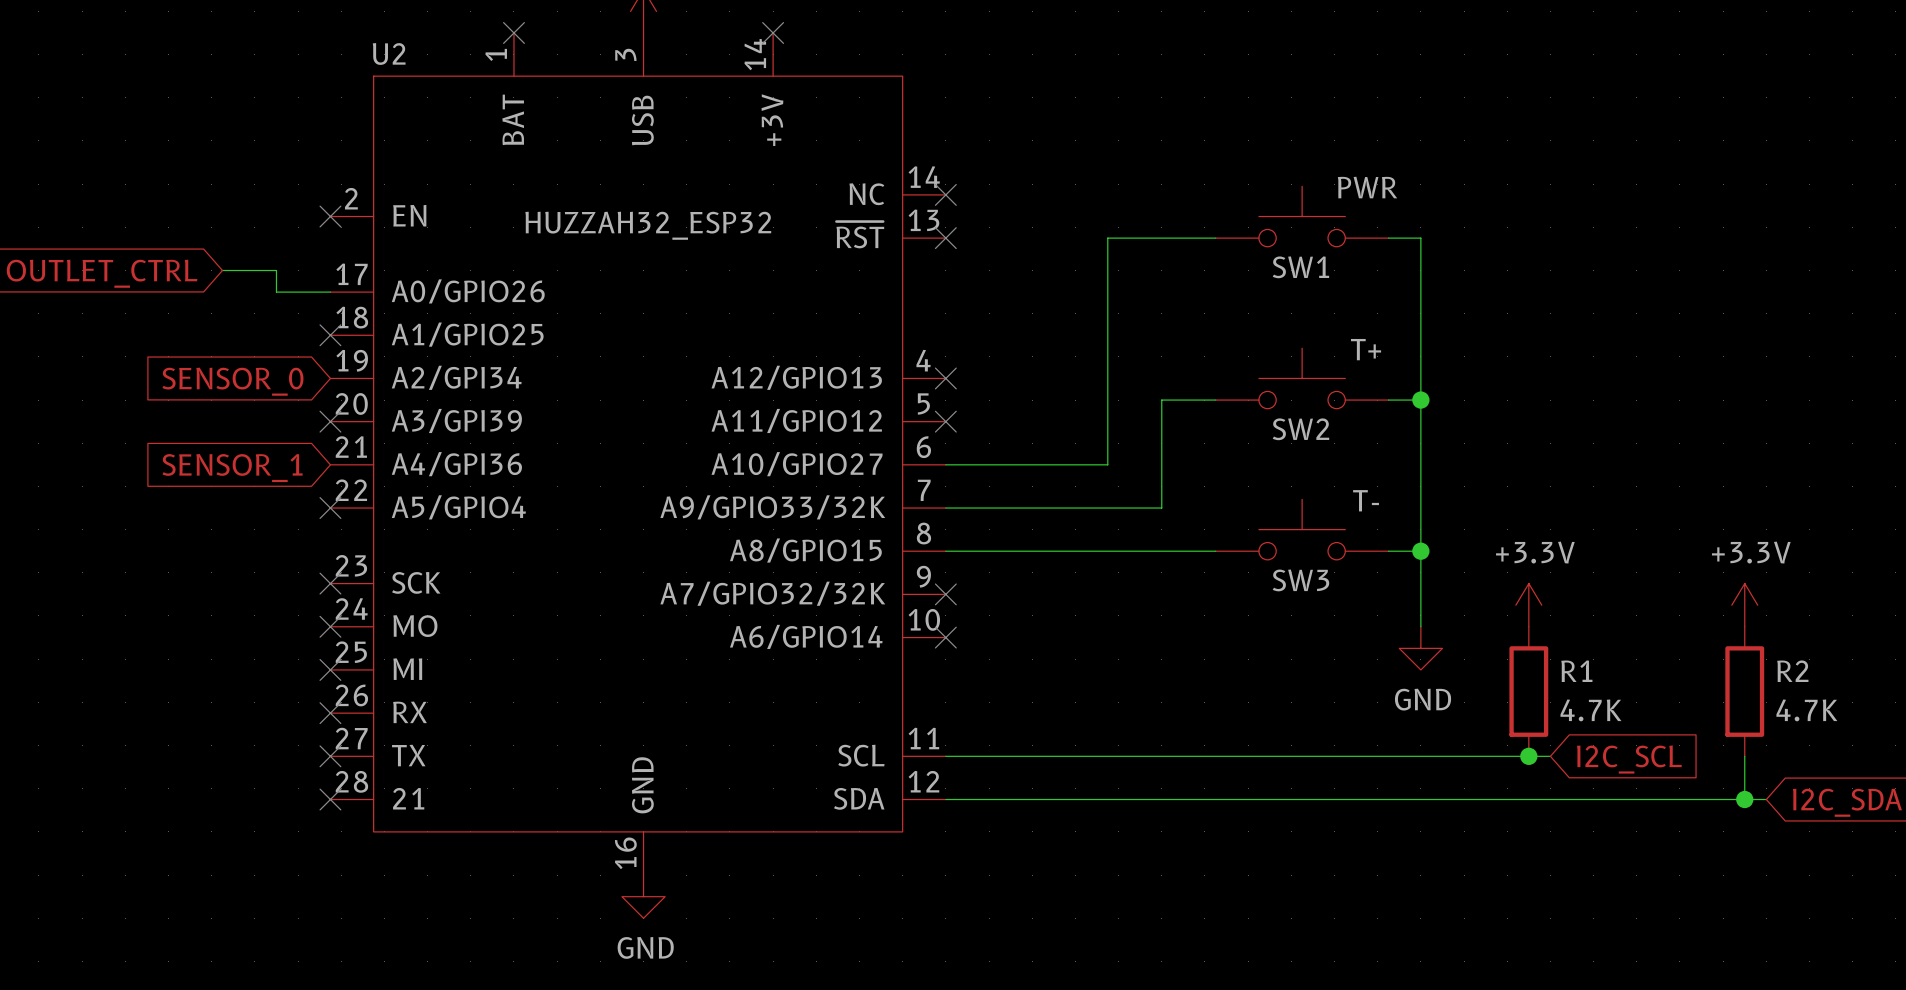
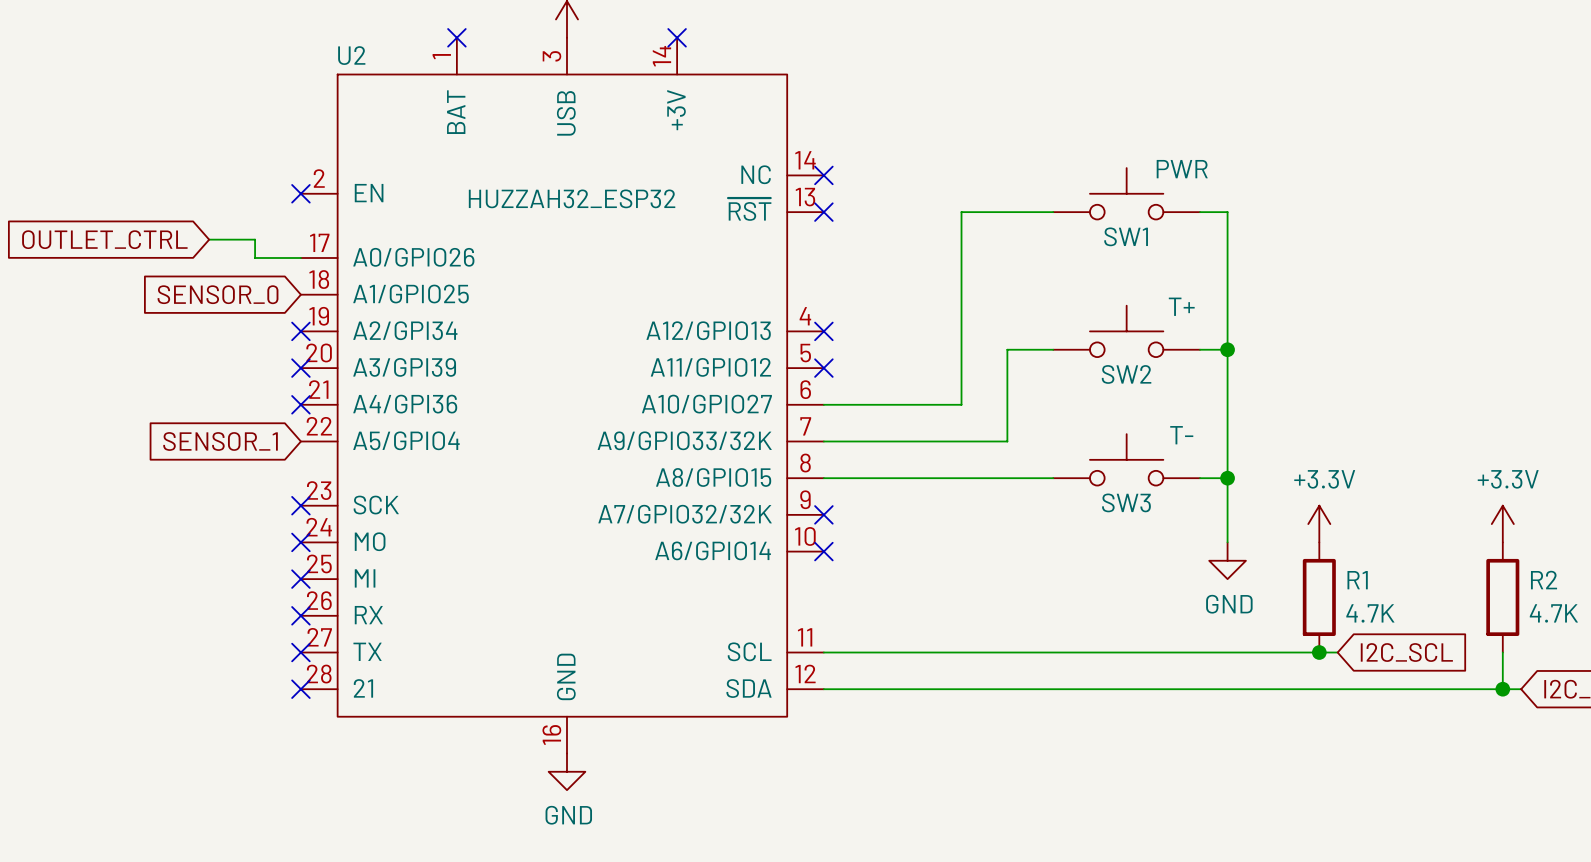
no-connect mark position: (330, 335) -> (300, 331)
global label position: SENSOR_0 (232, 381) -> SENSOR_0 (218, 294)
global label position: SENSOR_1 (232, 468) -> SENSOR_1 (220, 441)
no-connect mark position: (330, 508) -> (300, 404)

